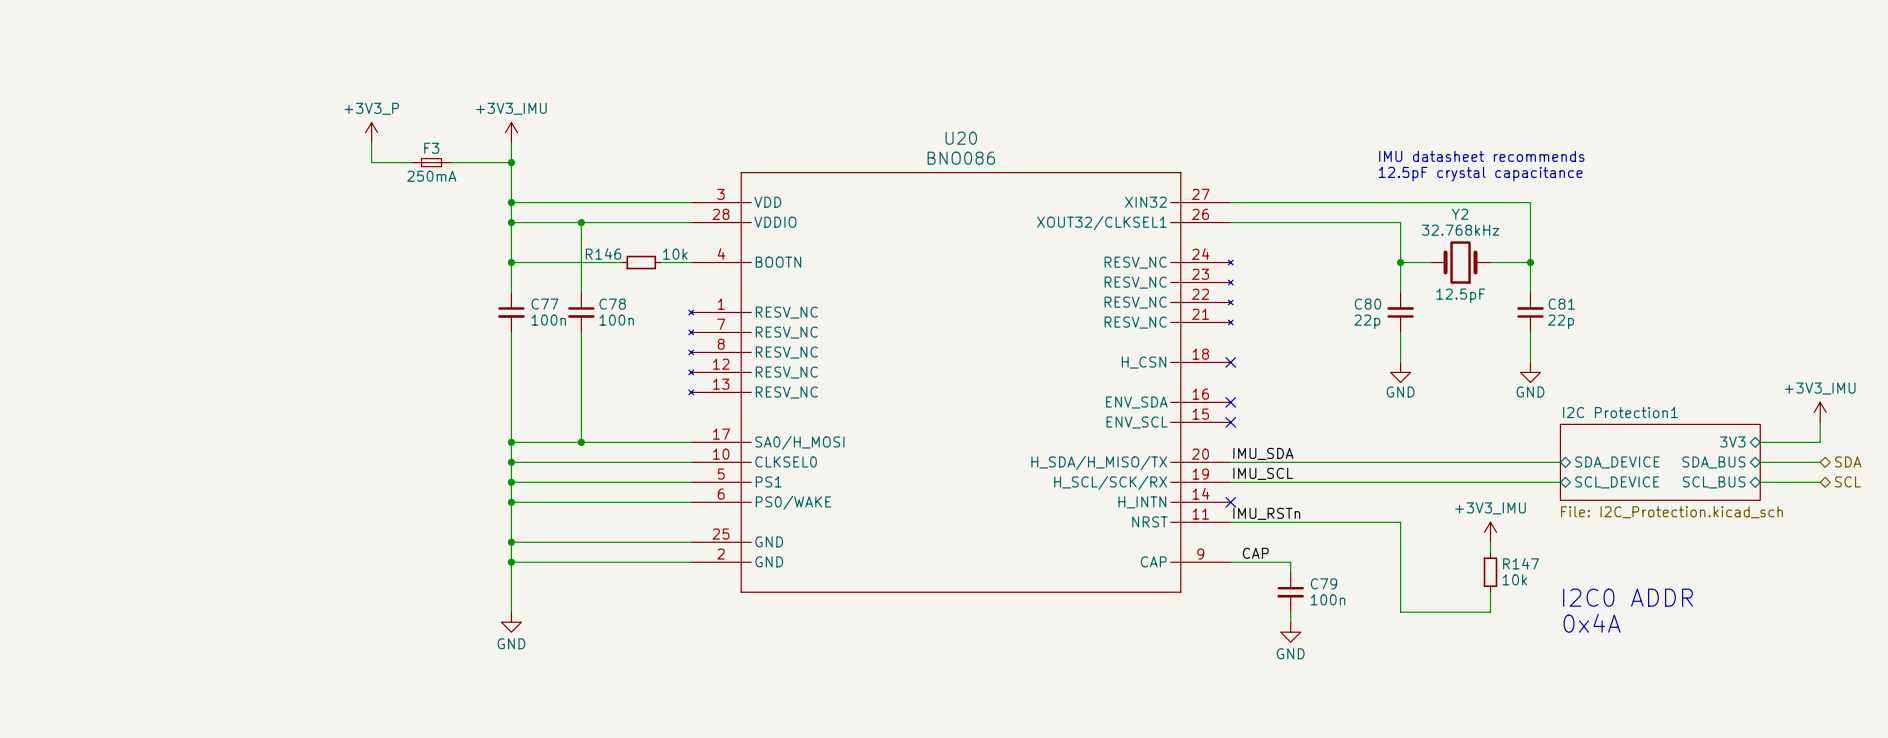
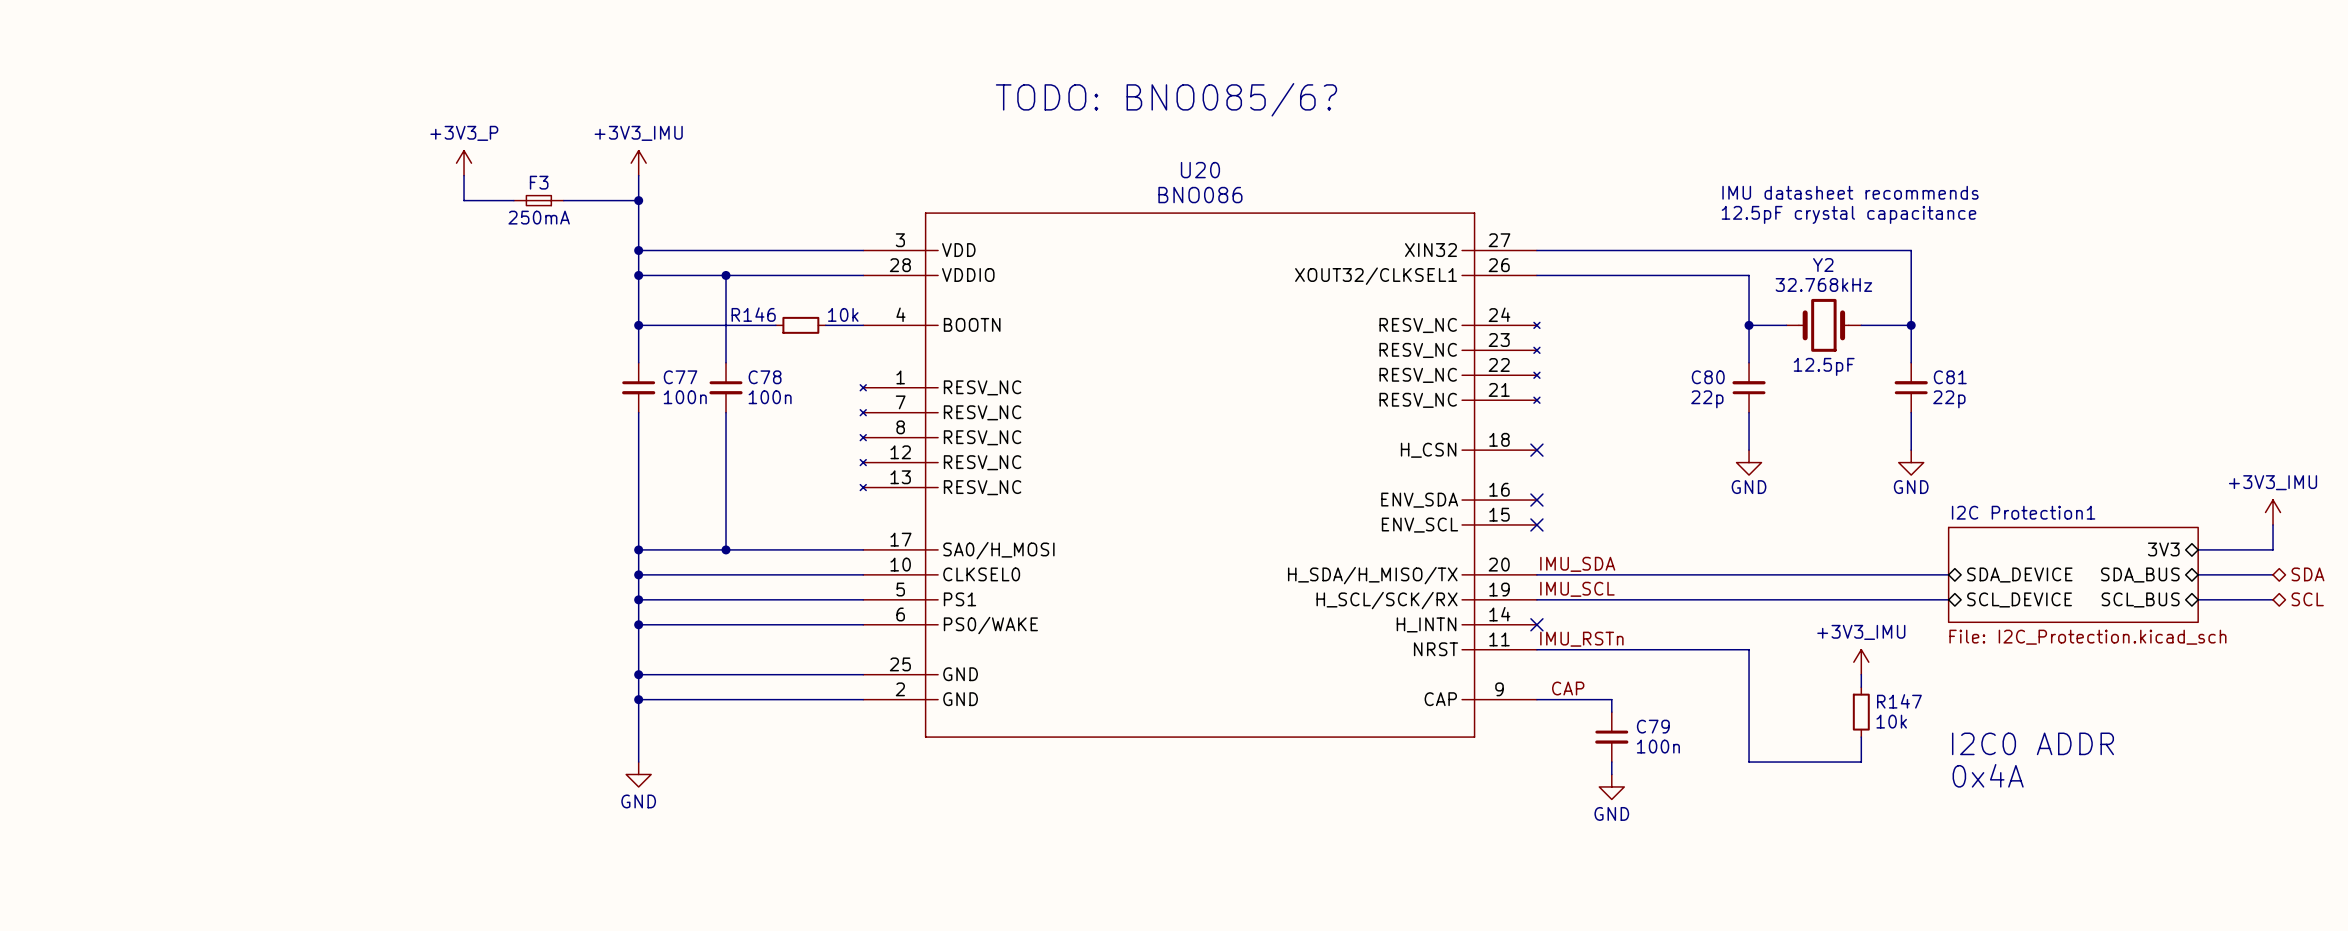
text: none -> TODO: BNO085/6? (1166, 99)

